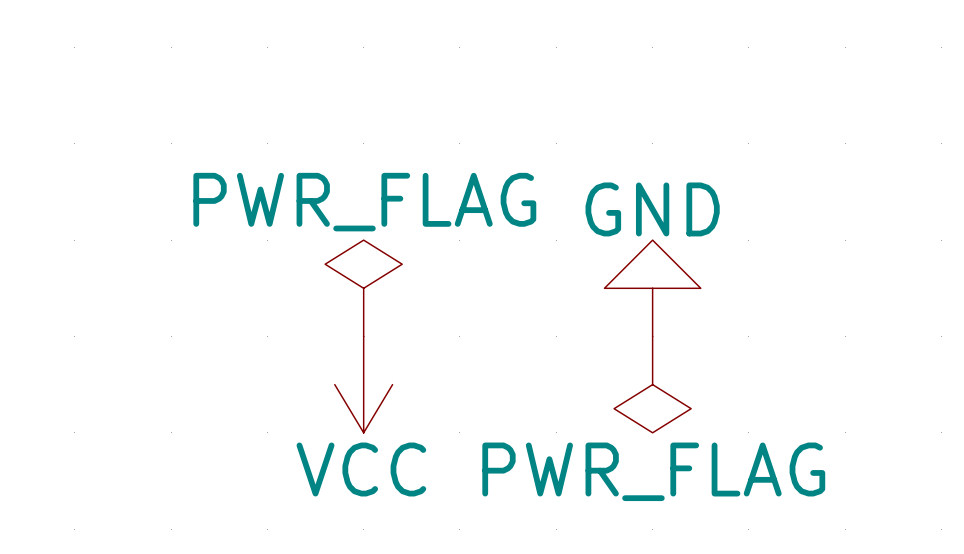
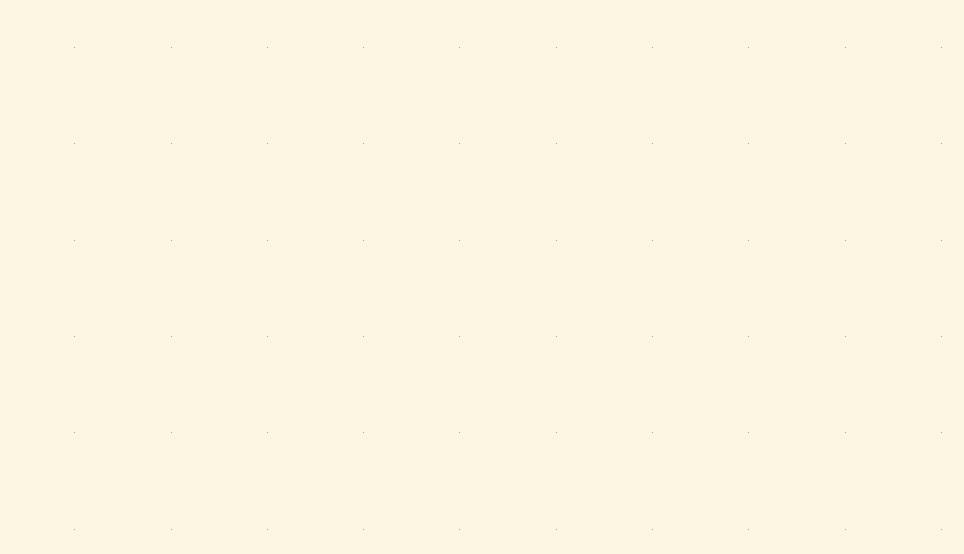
power symbol: PWR_FLAG (363, 288) -> none
power symbol: GND (652, 288) -> none
power symbol: VCC (363, 384) -> none
power symbol: PWR_FLAG (652, 384) -> none

